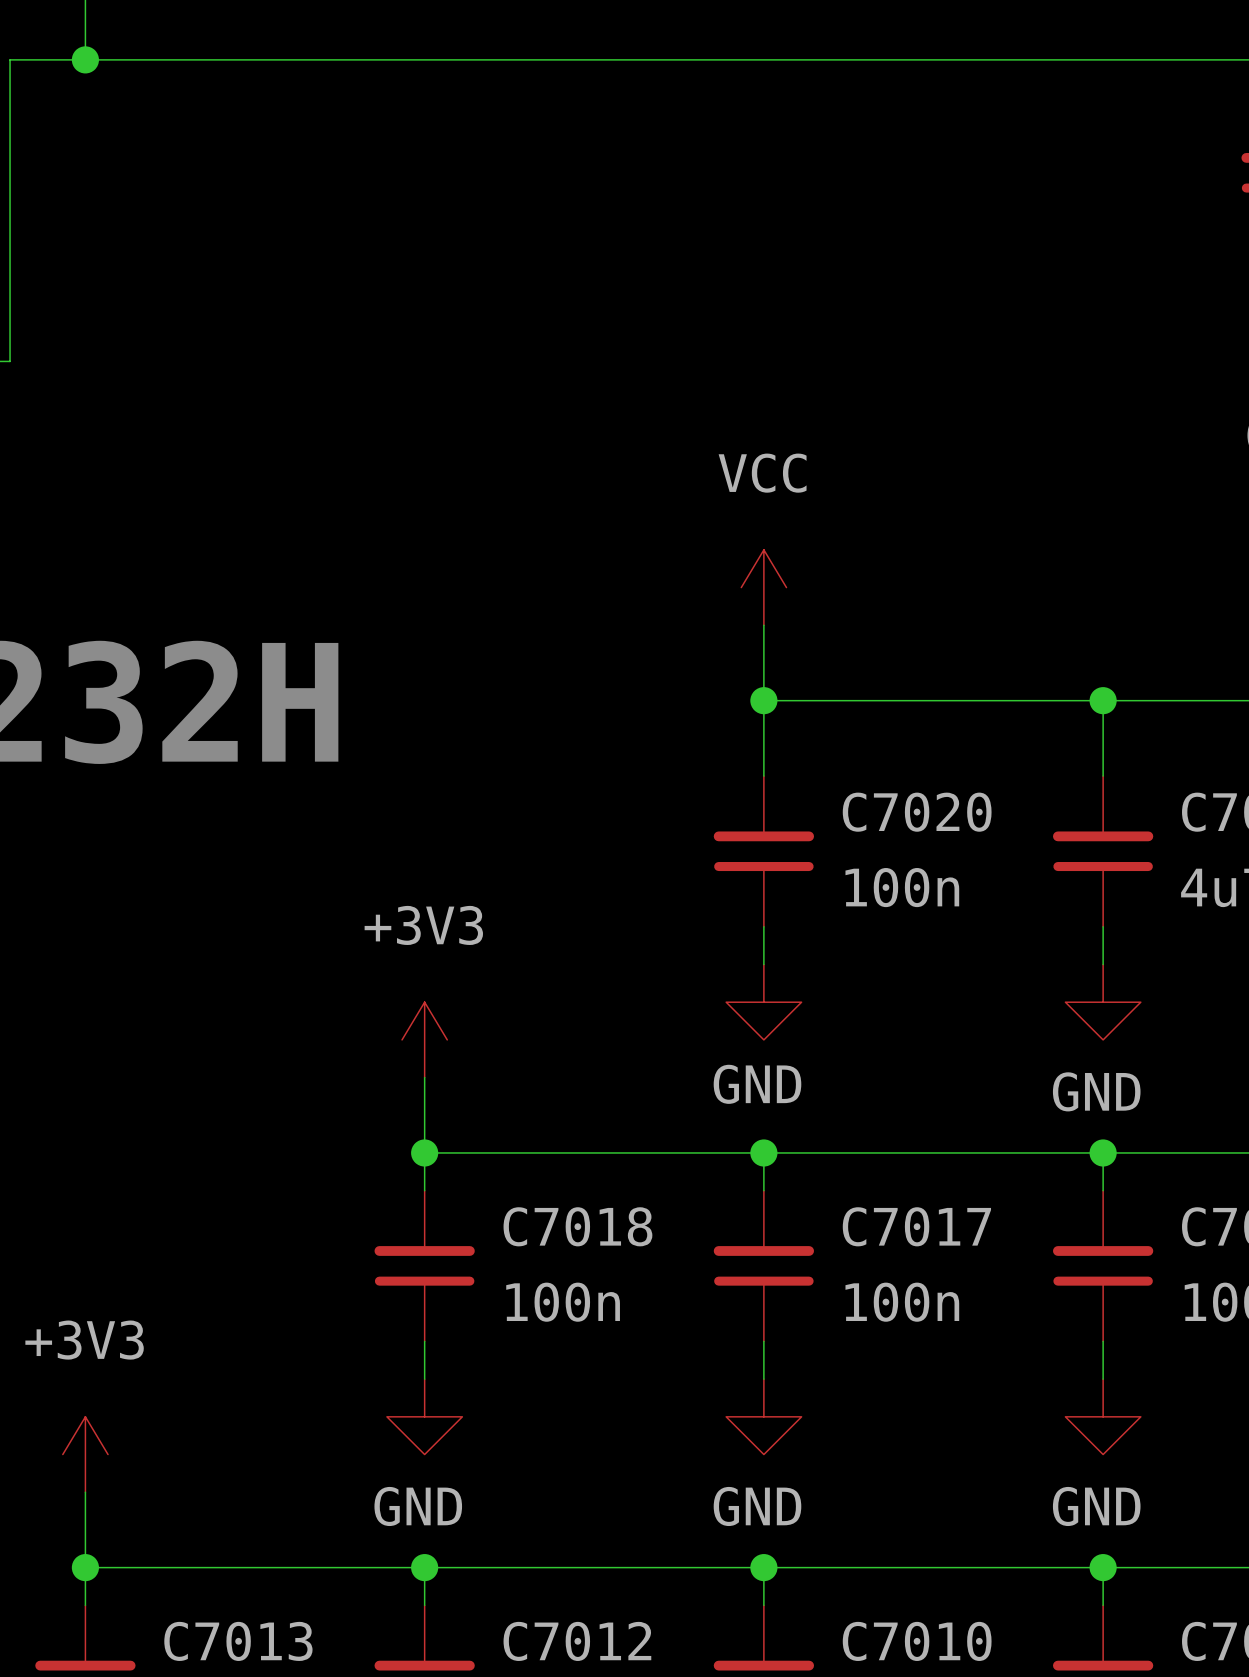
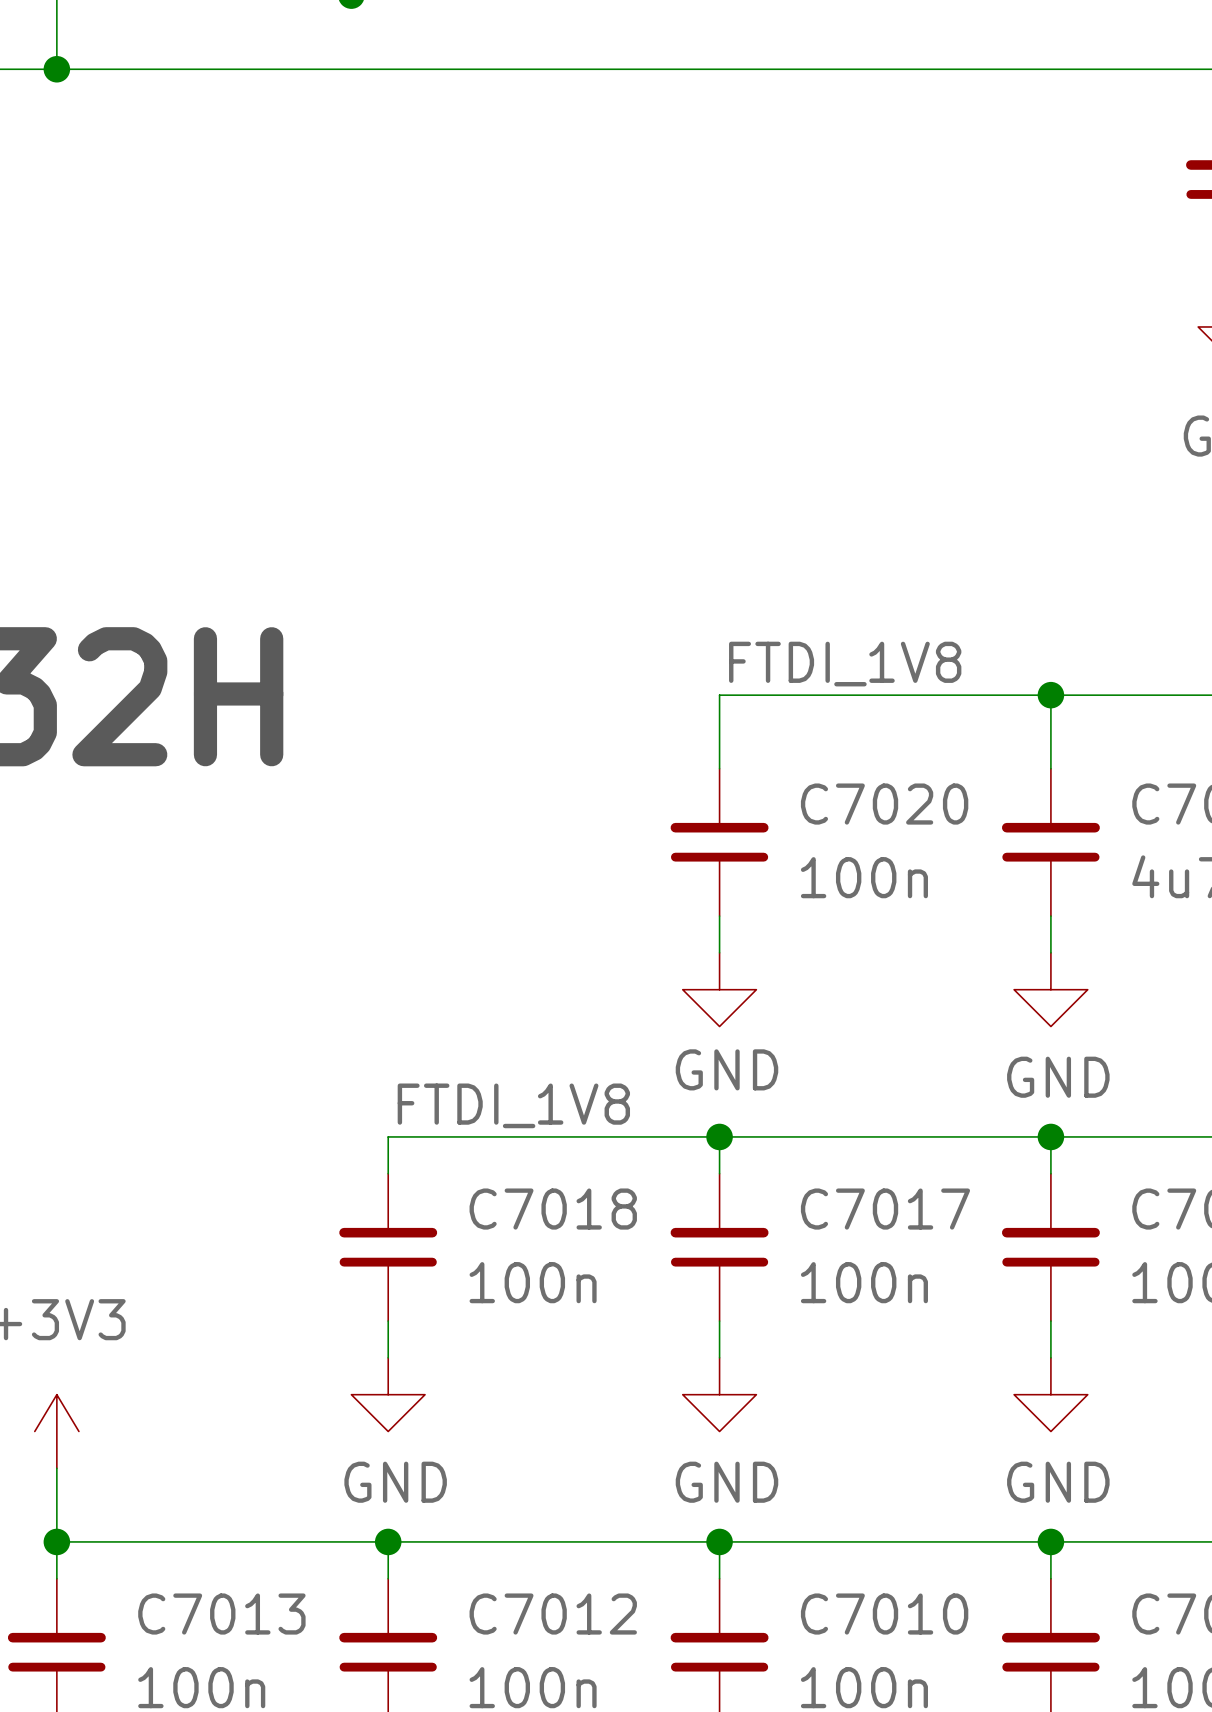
power symbol: VCC (763, 587) -> none
wire: (763, 625) (763, 700) -> none
label: none -> FTDI_1V8 (845, 664)
junction: (763, 700) -> none
power symbol: +3V3 (424, 1039) -> none
wire: (424, 1077) (424, 1152) -> none
label: none -> FTDI_1V8 (513, 1105)
junction: (424, 1152) -> none

